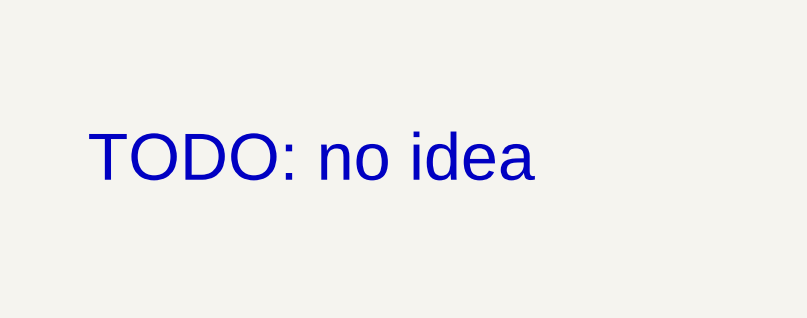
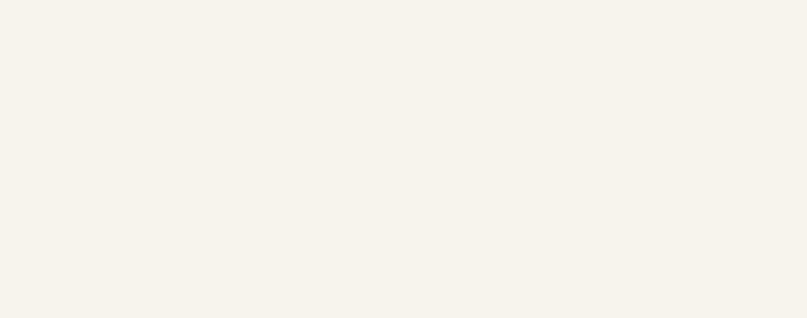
text: TODO: no idea (312, 155) -> none

